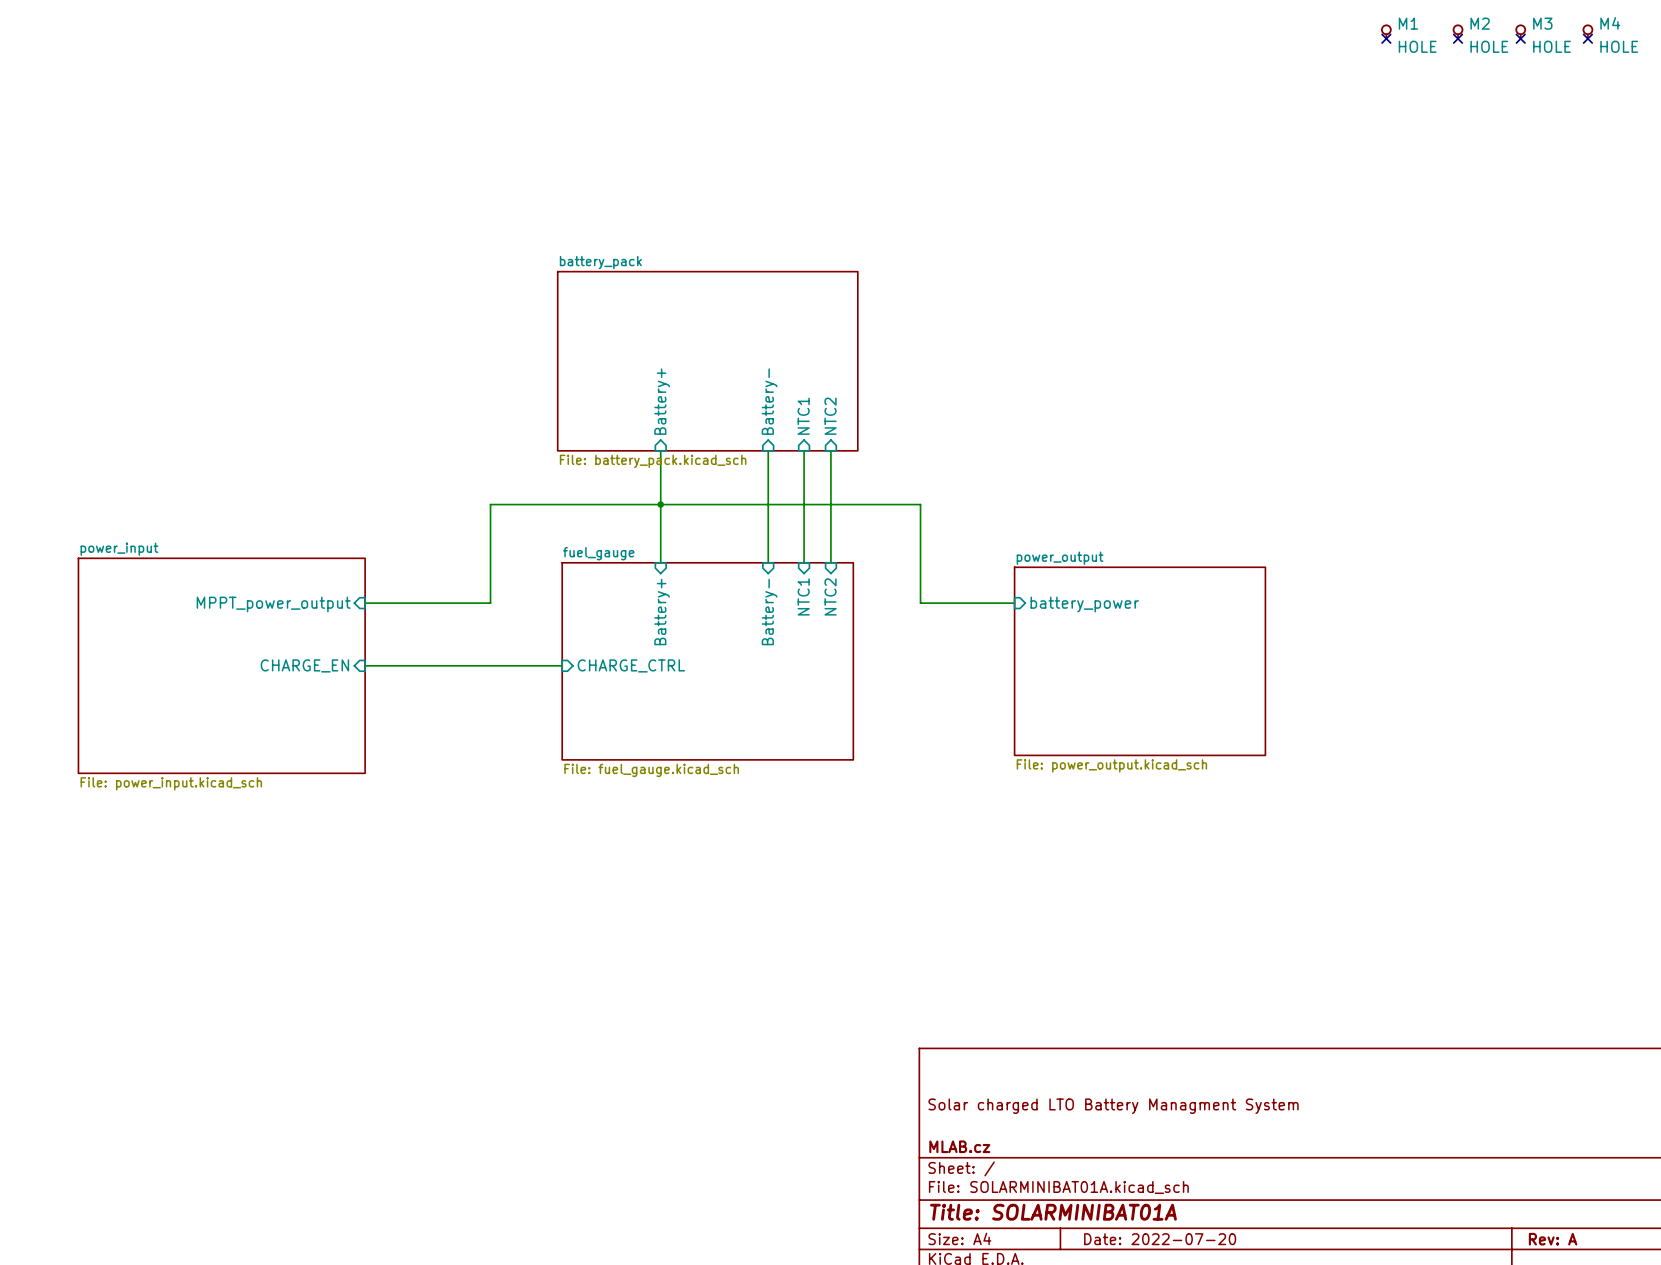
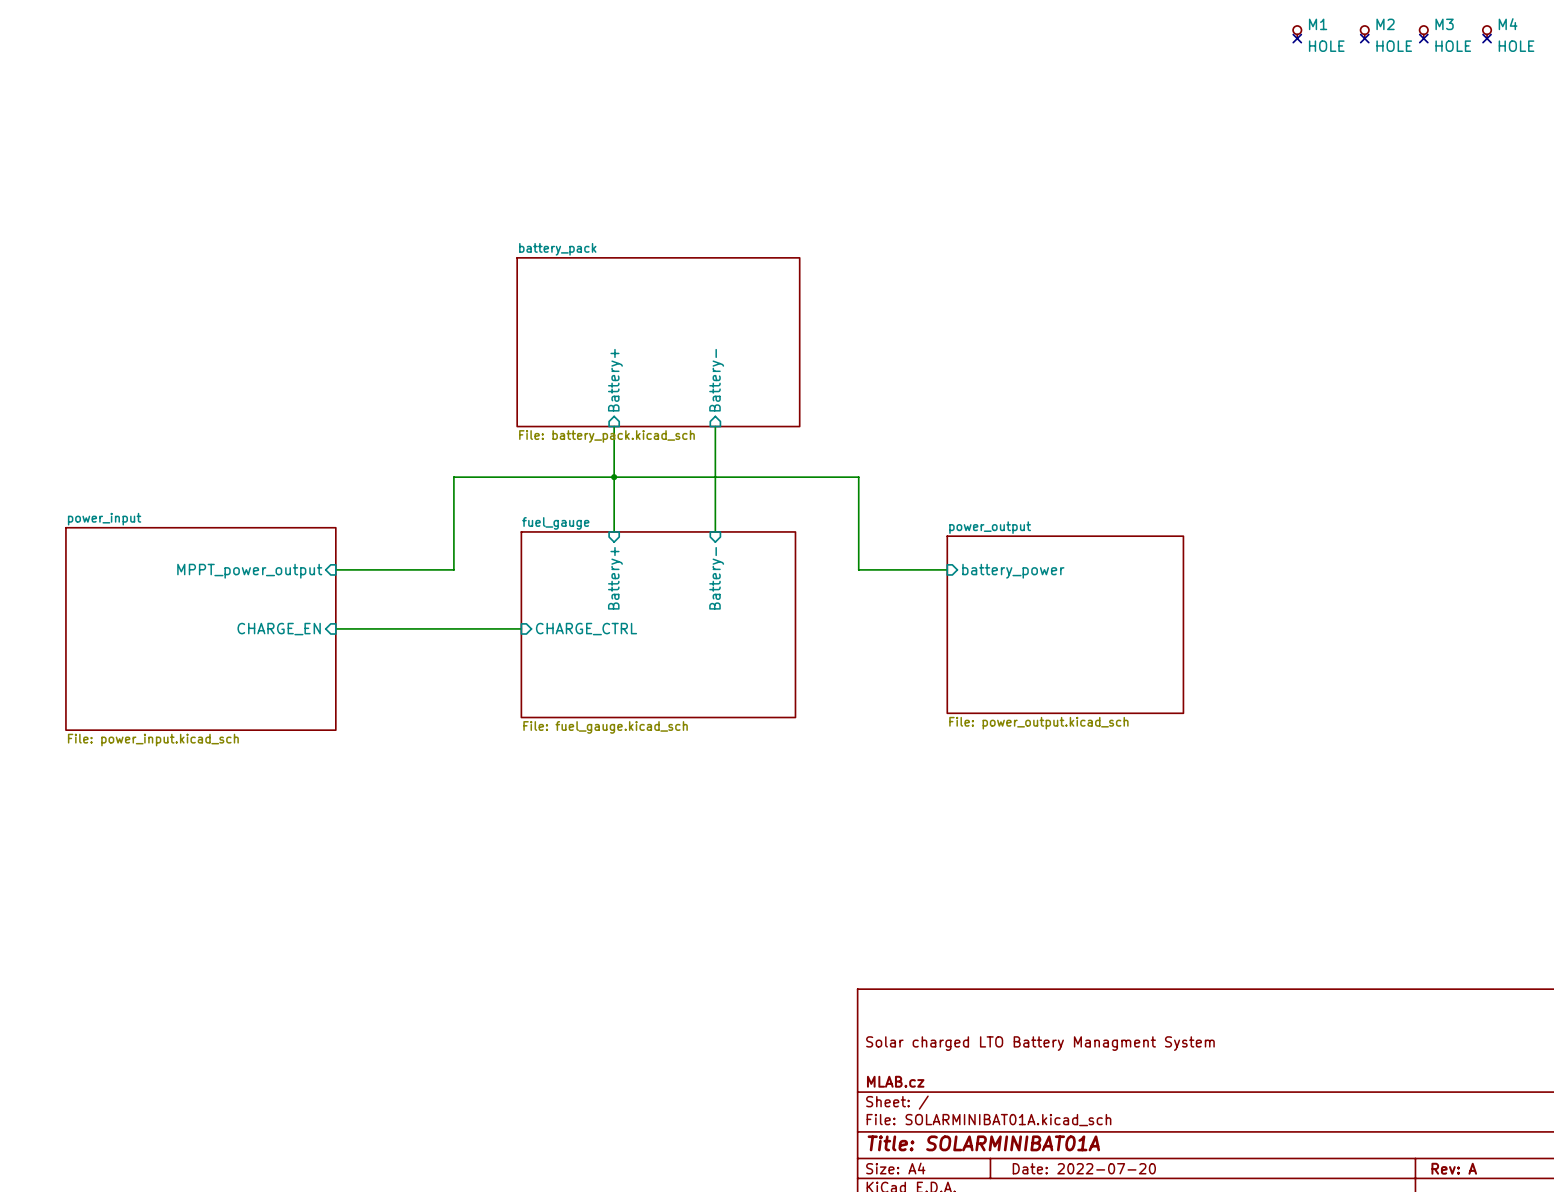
sheet pin: NTC1 (803, 416) -> none
sheet pin: NTC2 (830, 416) -> none
wire: (804, 450) (804, 562) -> none
wire: (830, 450) (830, 562) -> none
sheet pin: NTC1 (803, 596) -> none
sheet pin: NTC2 (830, 596) -> none

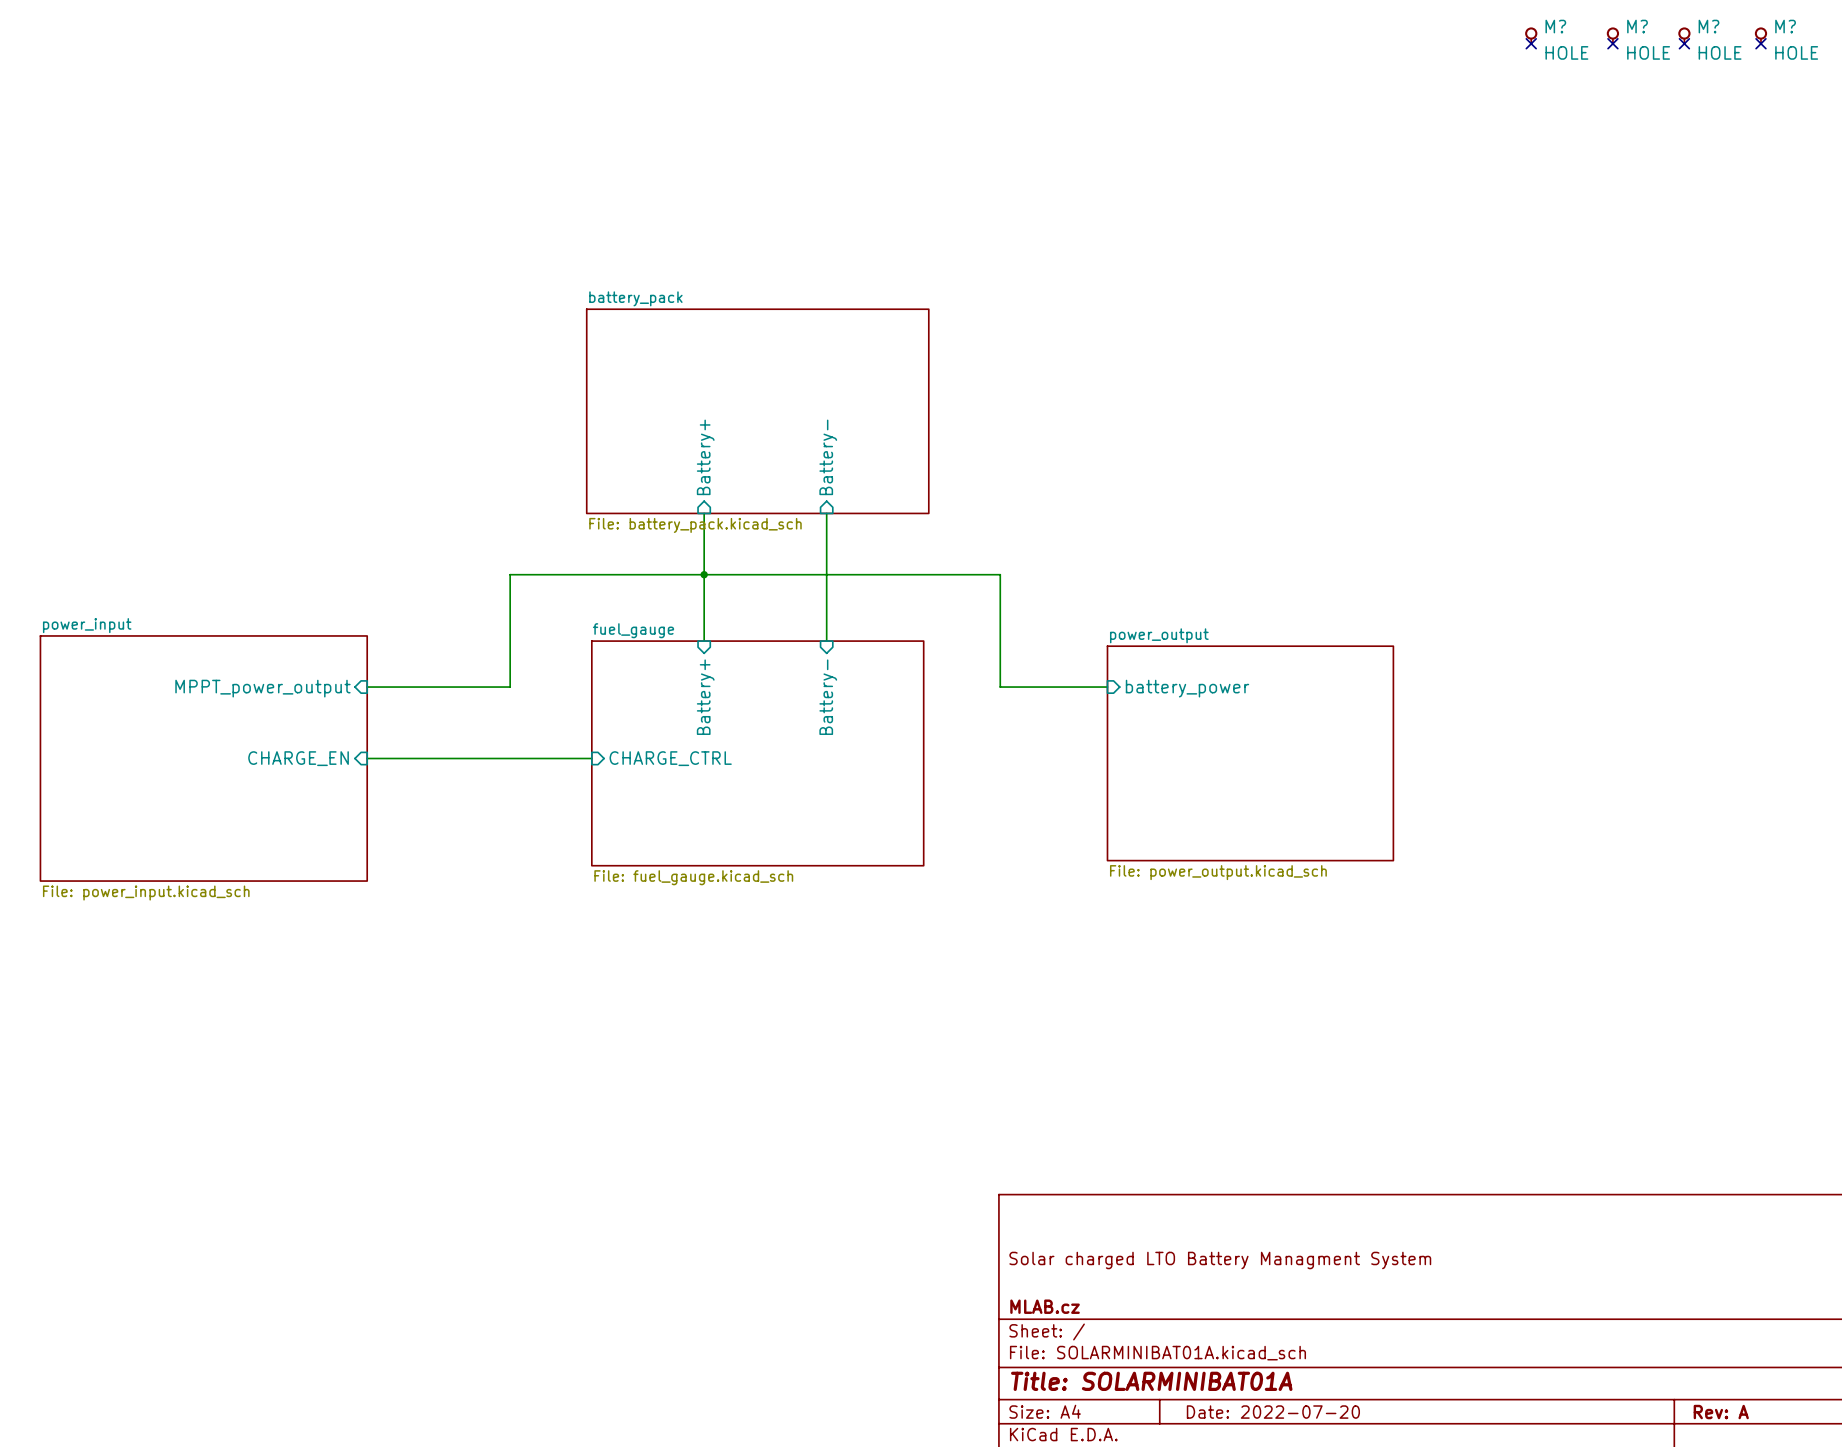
M1 name: M1 (1318, 24) -> M? (1555, 26)
M2 name: M2 (1385, 24) -> M? (1637, 26)
M3 name: M3 (1444, 24) -> M? (1708, 26)
M4 name: M4 (1508, 24) -> M? (1785, 26)

